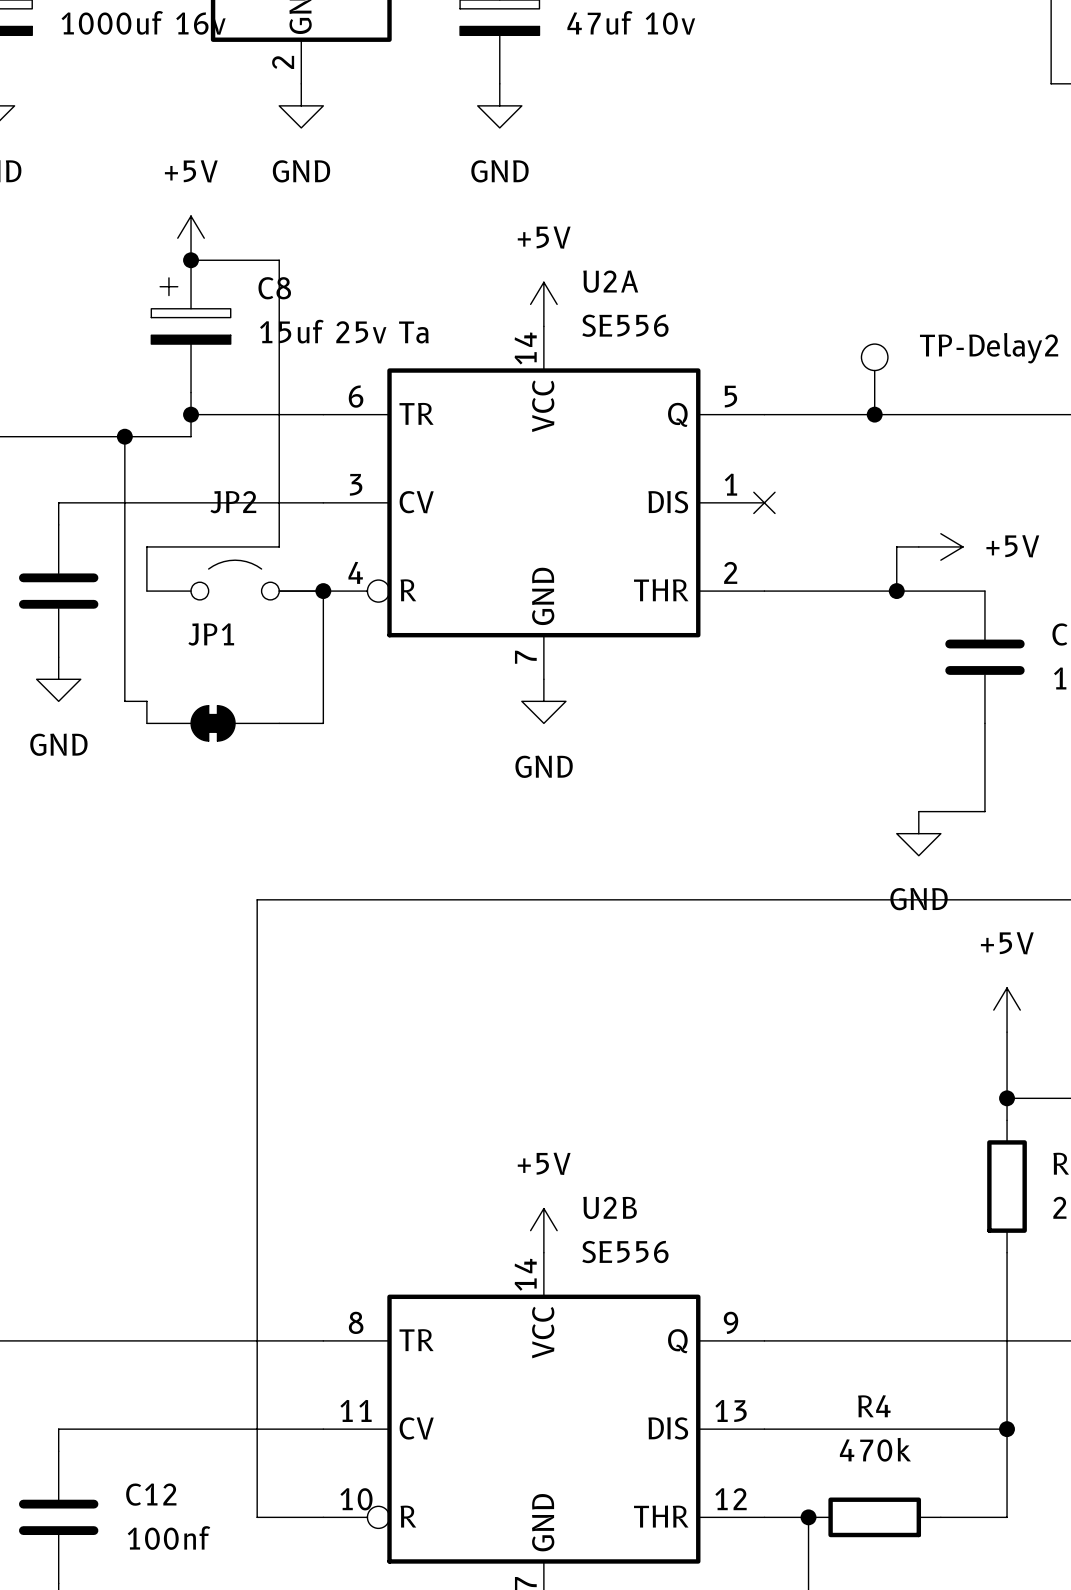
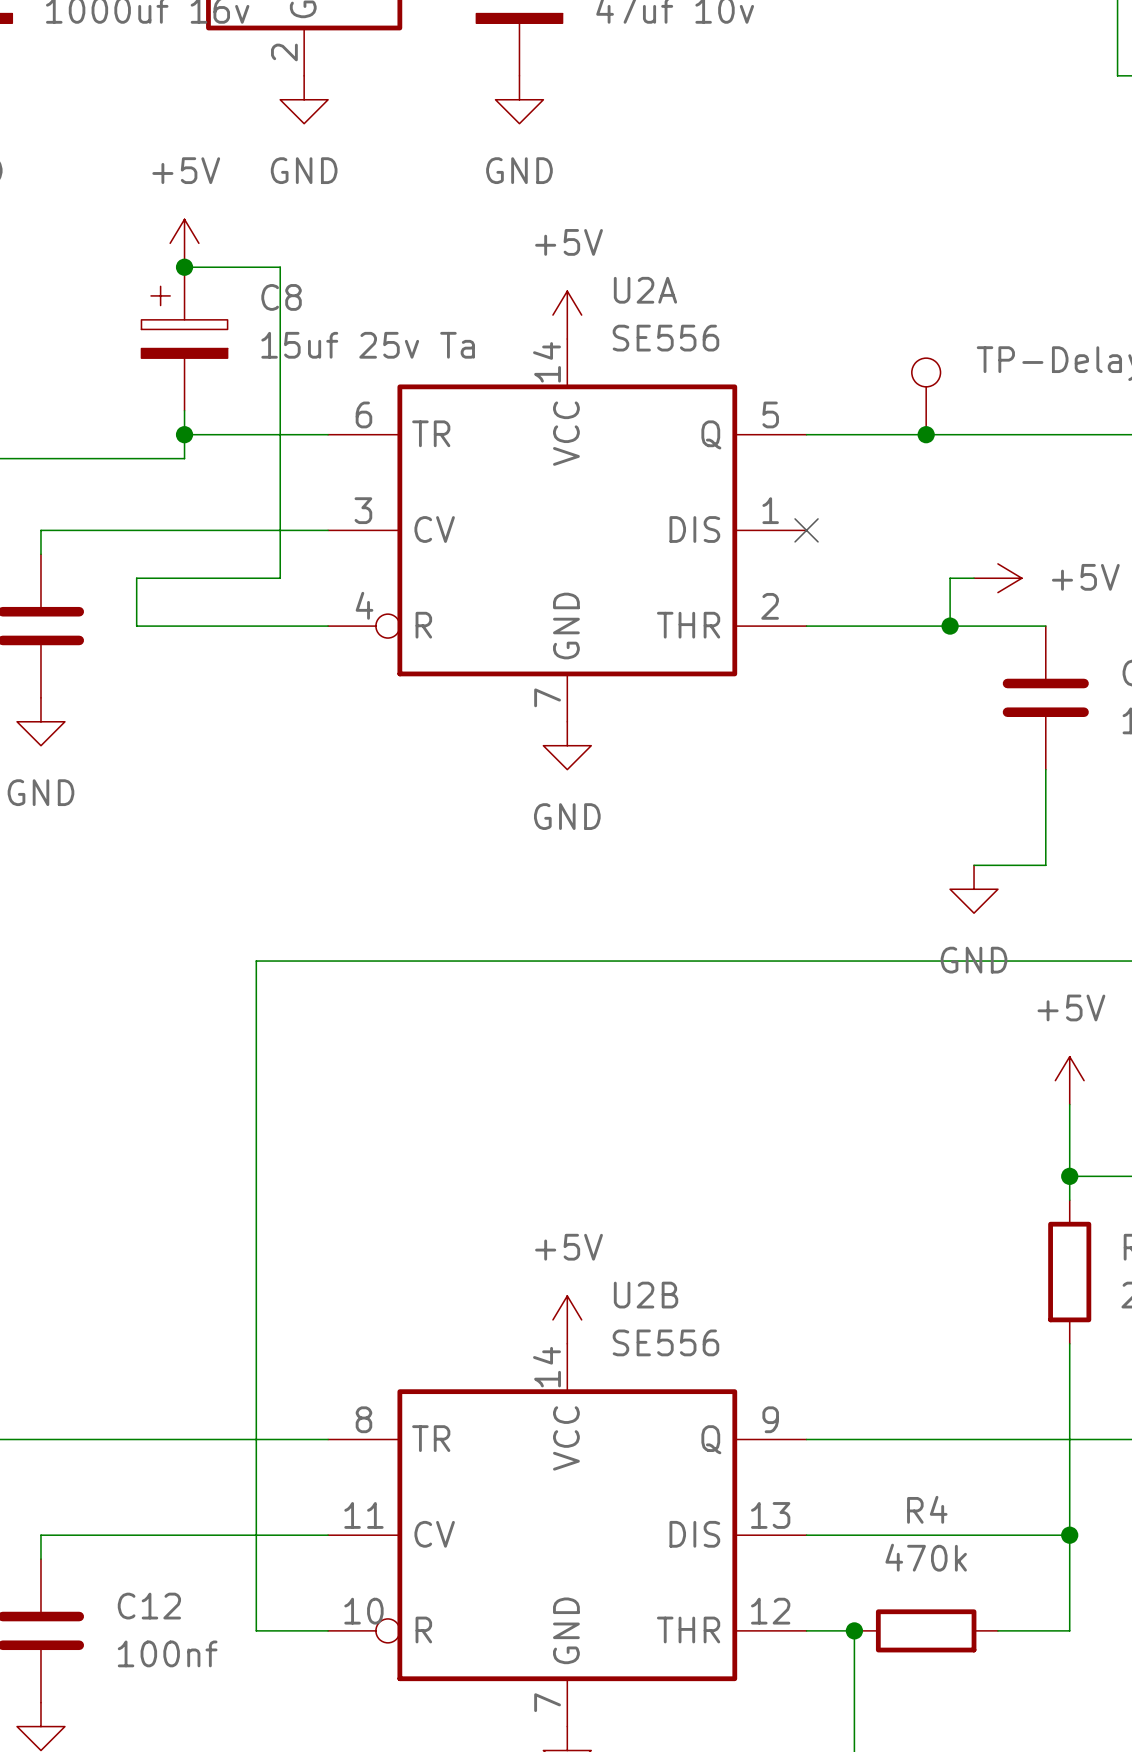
wire: (124, 436) (124, 701) (146, 701) (146, 723) -> none
junction: (124, 436) -> none
JP2: (235, 580) -> none
wire: none -> (136, 626) (280, 626)
wire: (323, 591) (323, 723) (279, 723) -> none
junction: (323, 591) -> none
JP1: (213, 723) -> none

